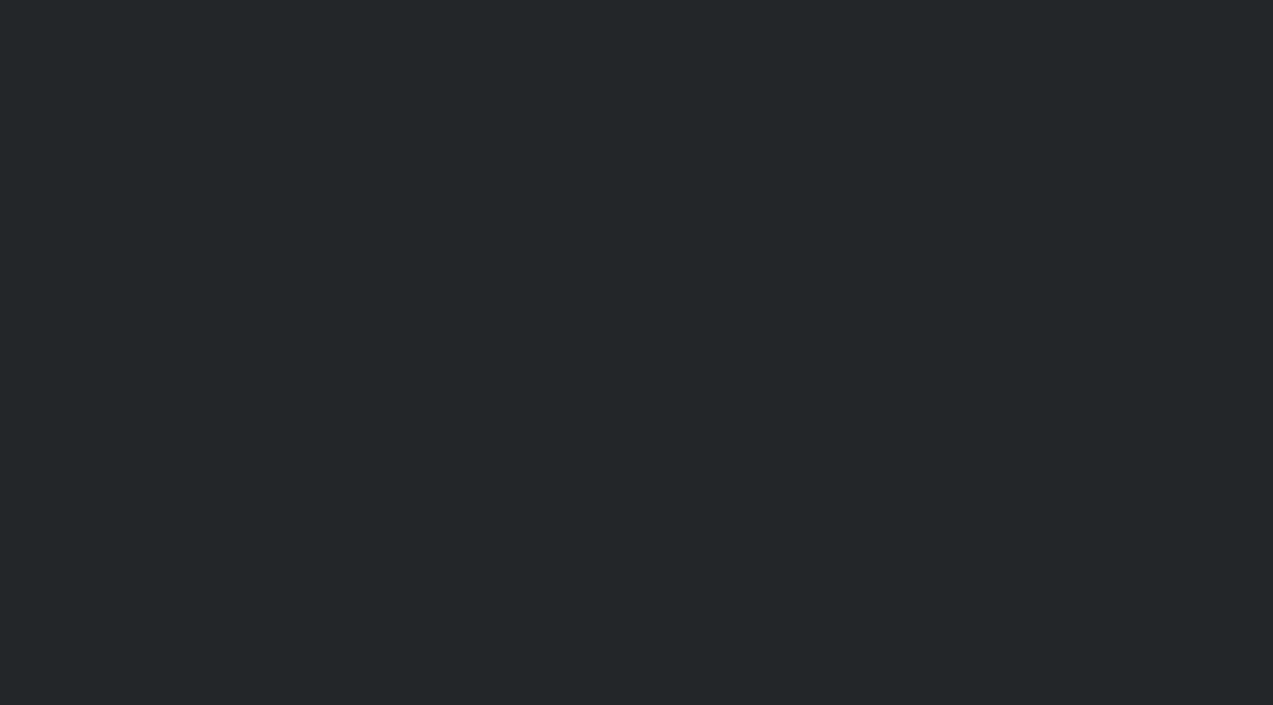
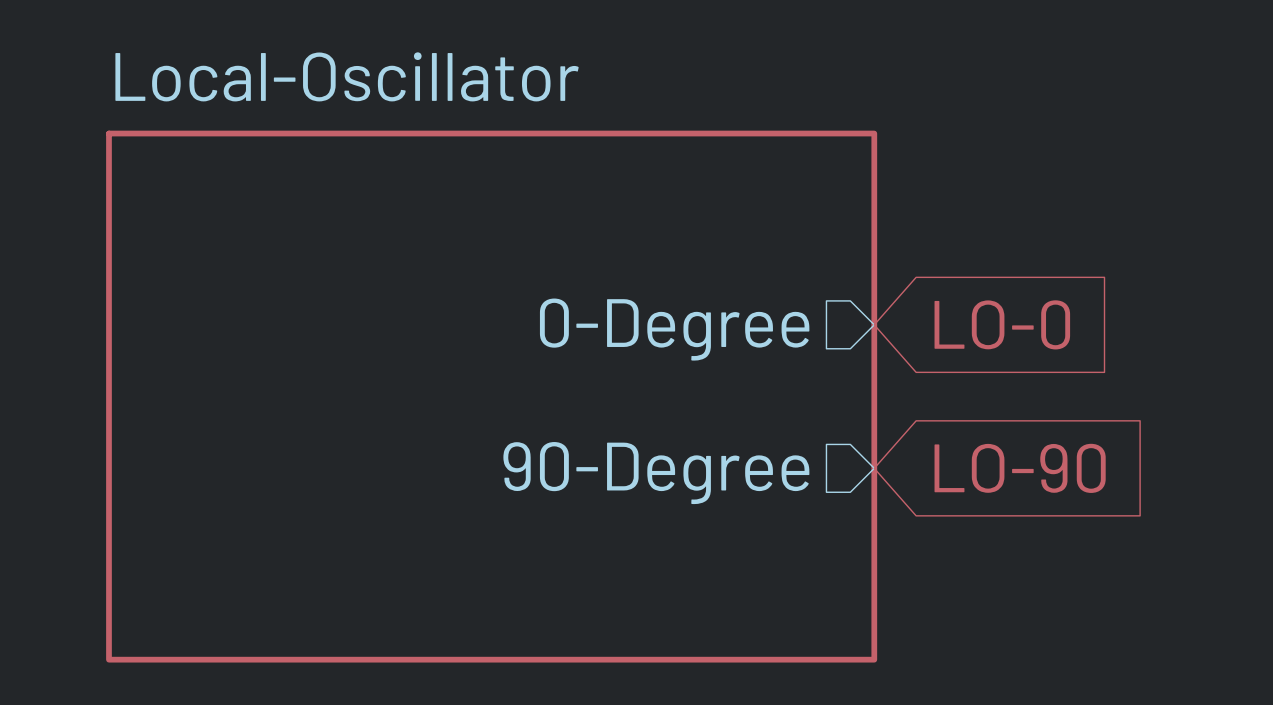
global label: none -> LO-0 (1002, 324)
sheet pin: none -> 0-Degree (674, 329)
sheet Local-Oscillator: none -> (491, 396)
global label: none -> LO-90 (1020, 468)
sheet pin: none -> 90-Degree (656, 473)

